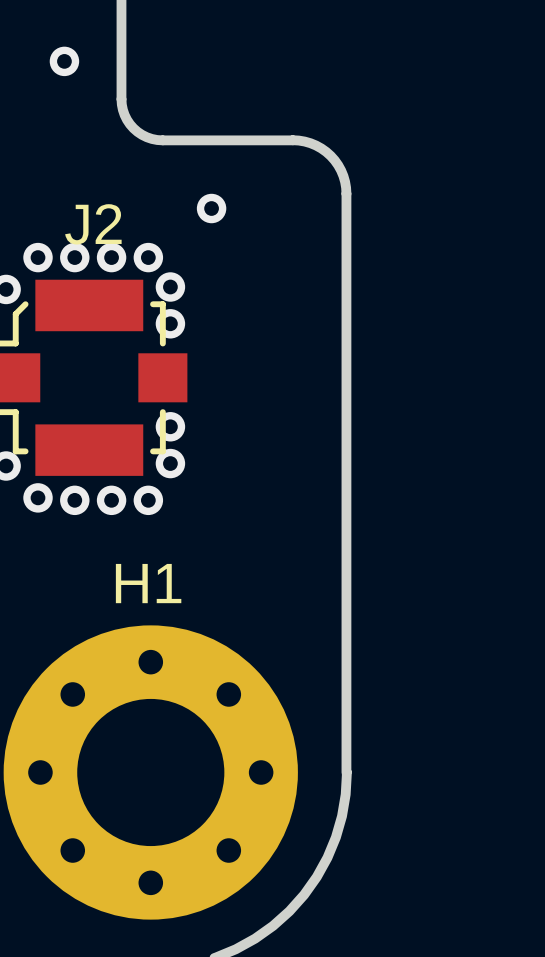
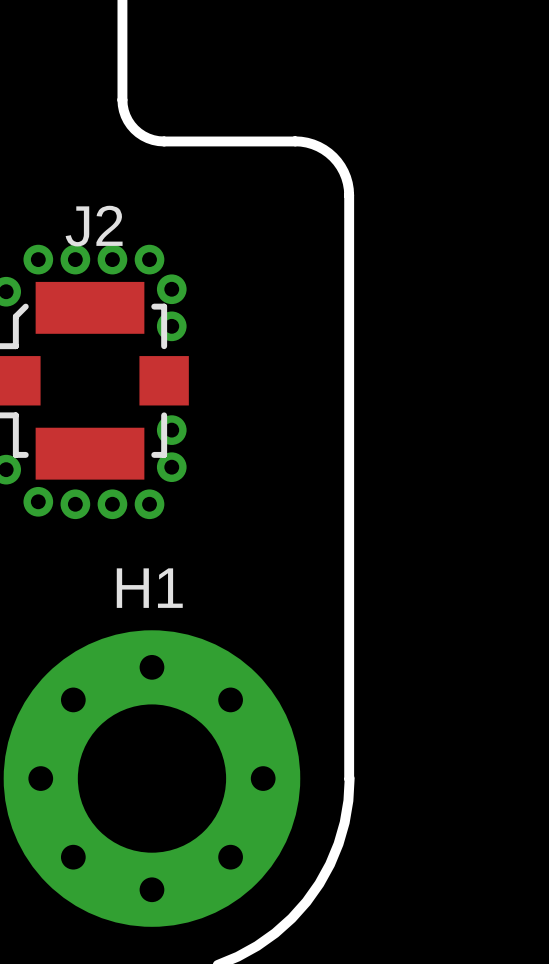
via: (64, 61) -> none
via: (211, 208) -> none

